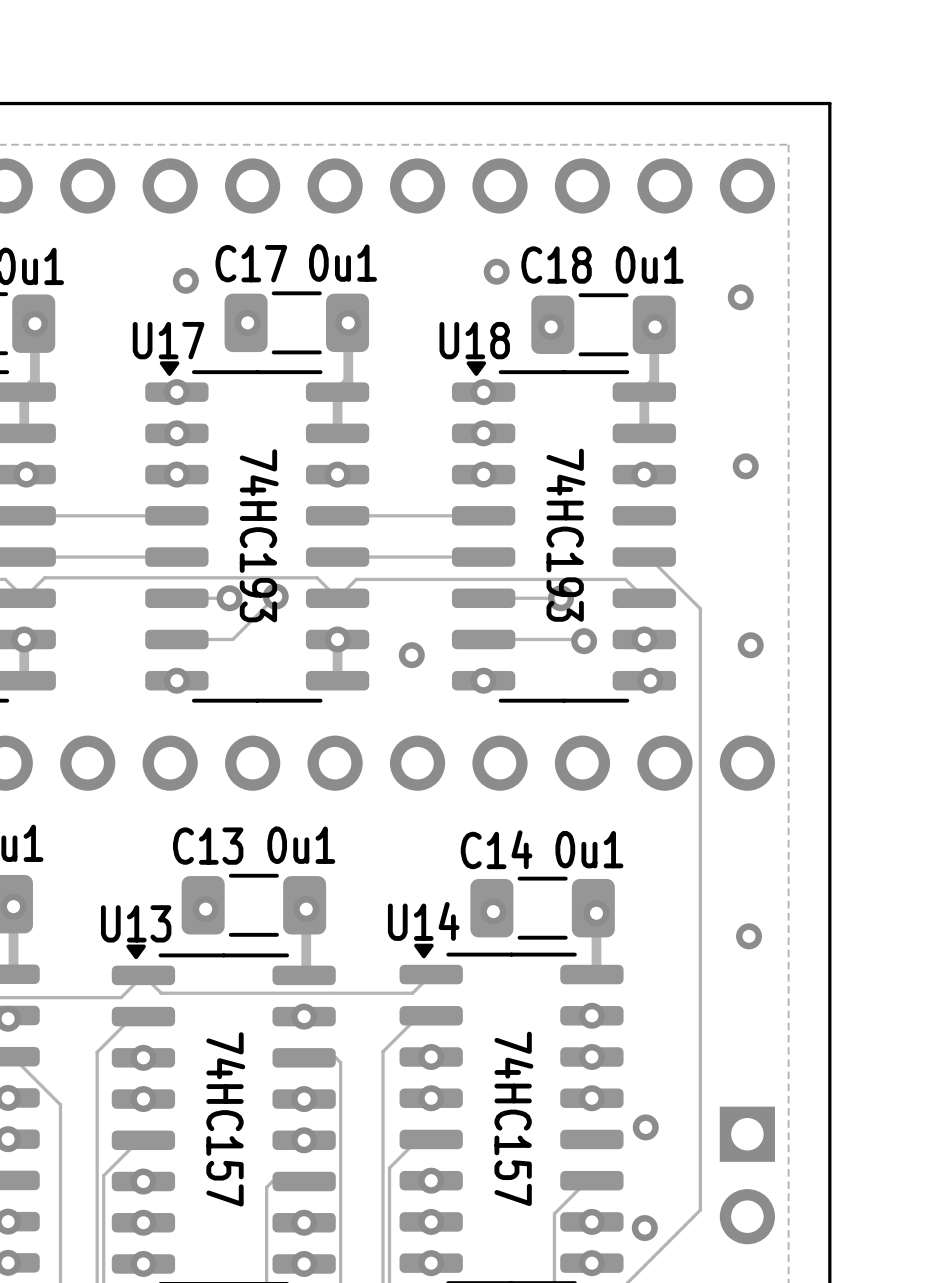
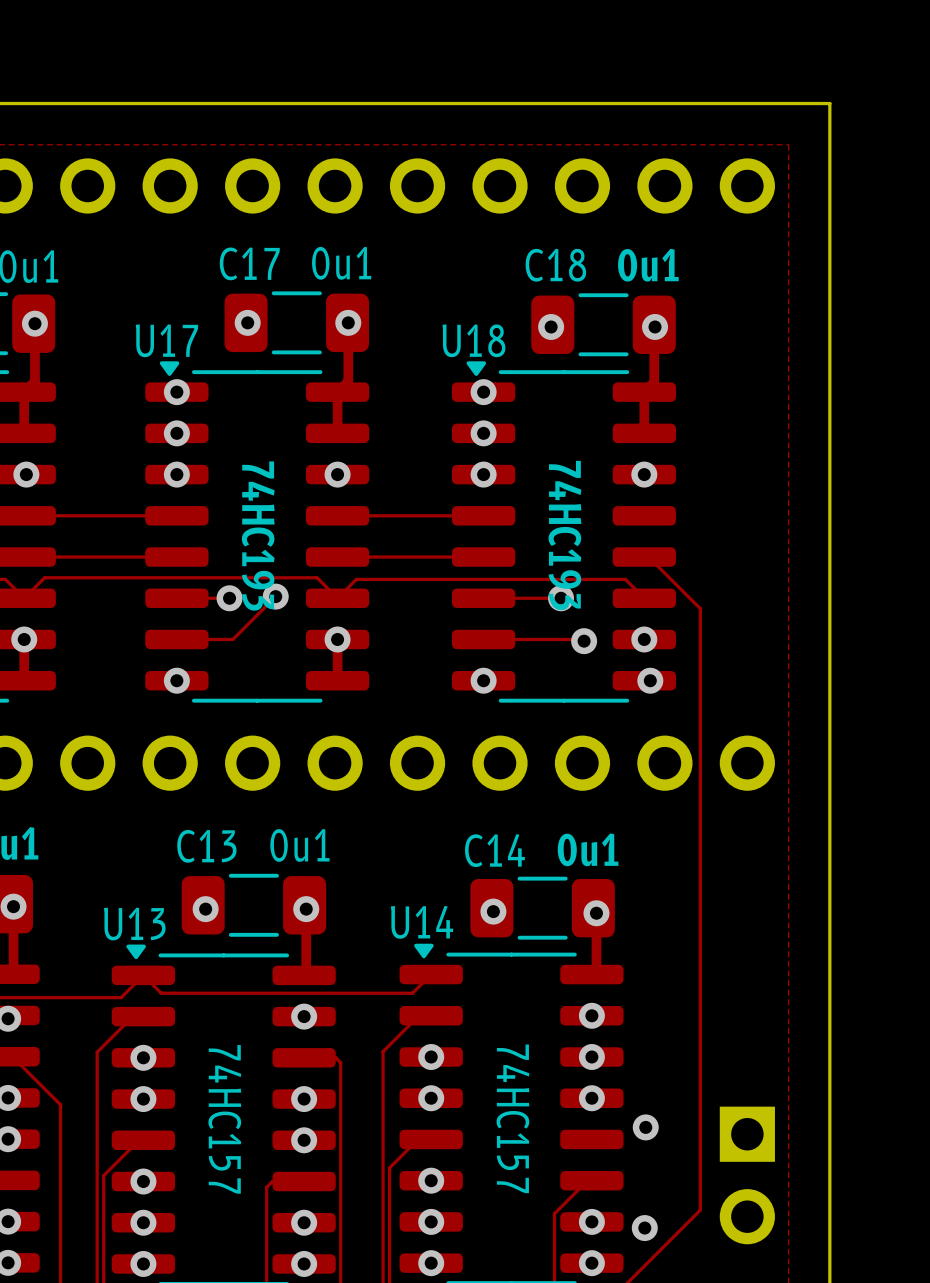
via: (496, 271) -> none
via: (185, 280) -> none
via: (740, 297) -> none
via: (745, 466) -> none
via: (750, 645) -> none
via: (411, 655) -> none
via: (749, 936) -> none

